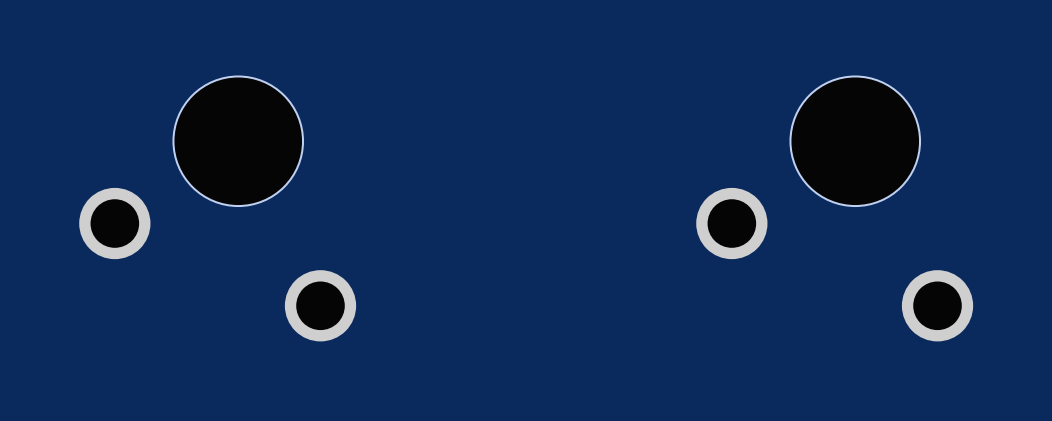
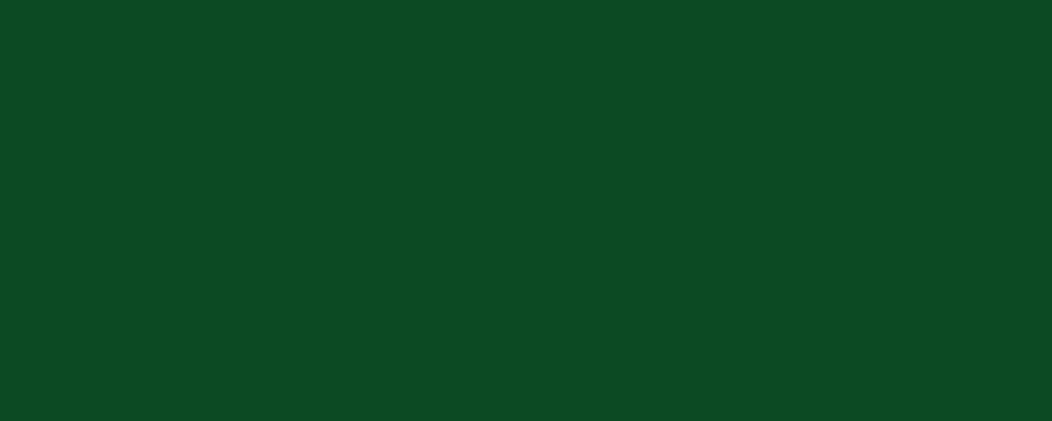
part: (217, 208) -> none
part: (834, 208) -> none

